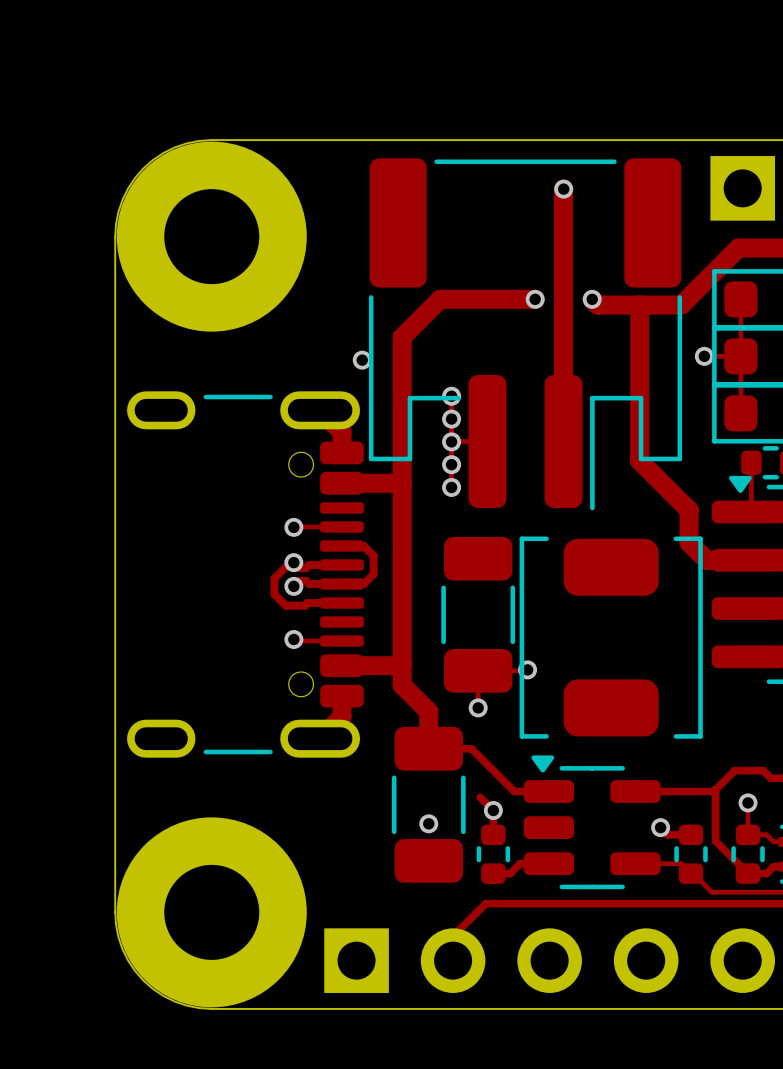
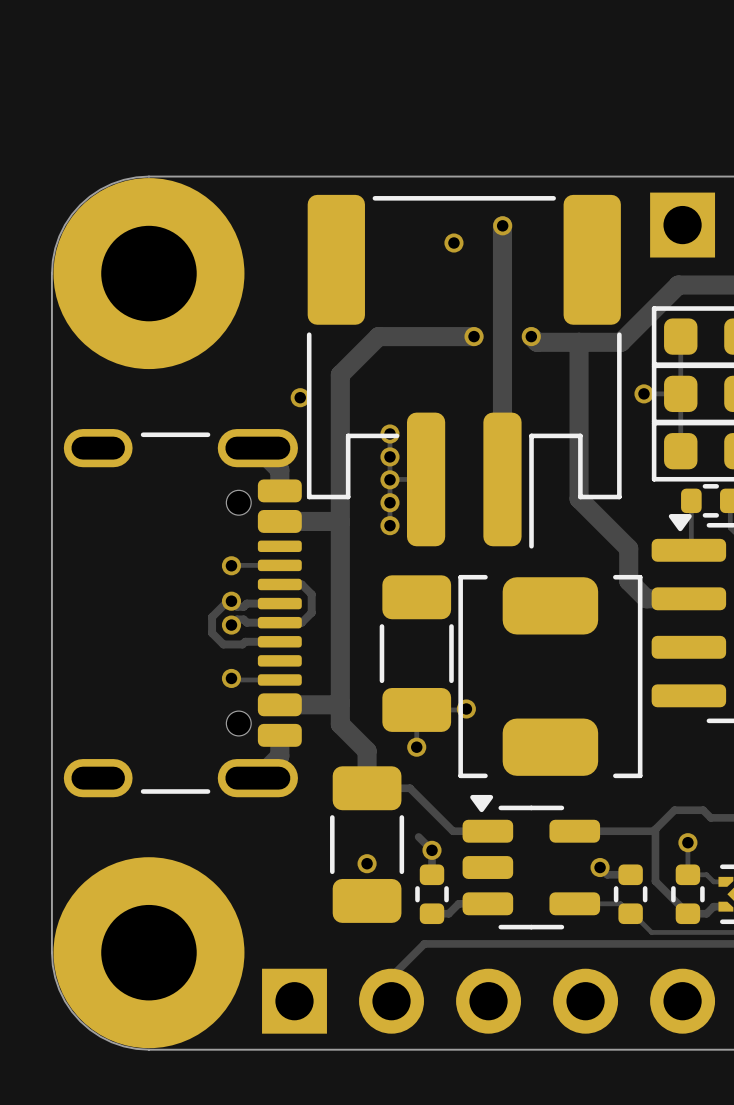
via: none -> (453, 243)

